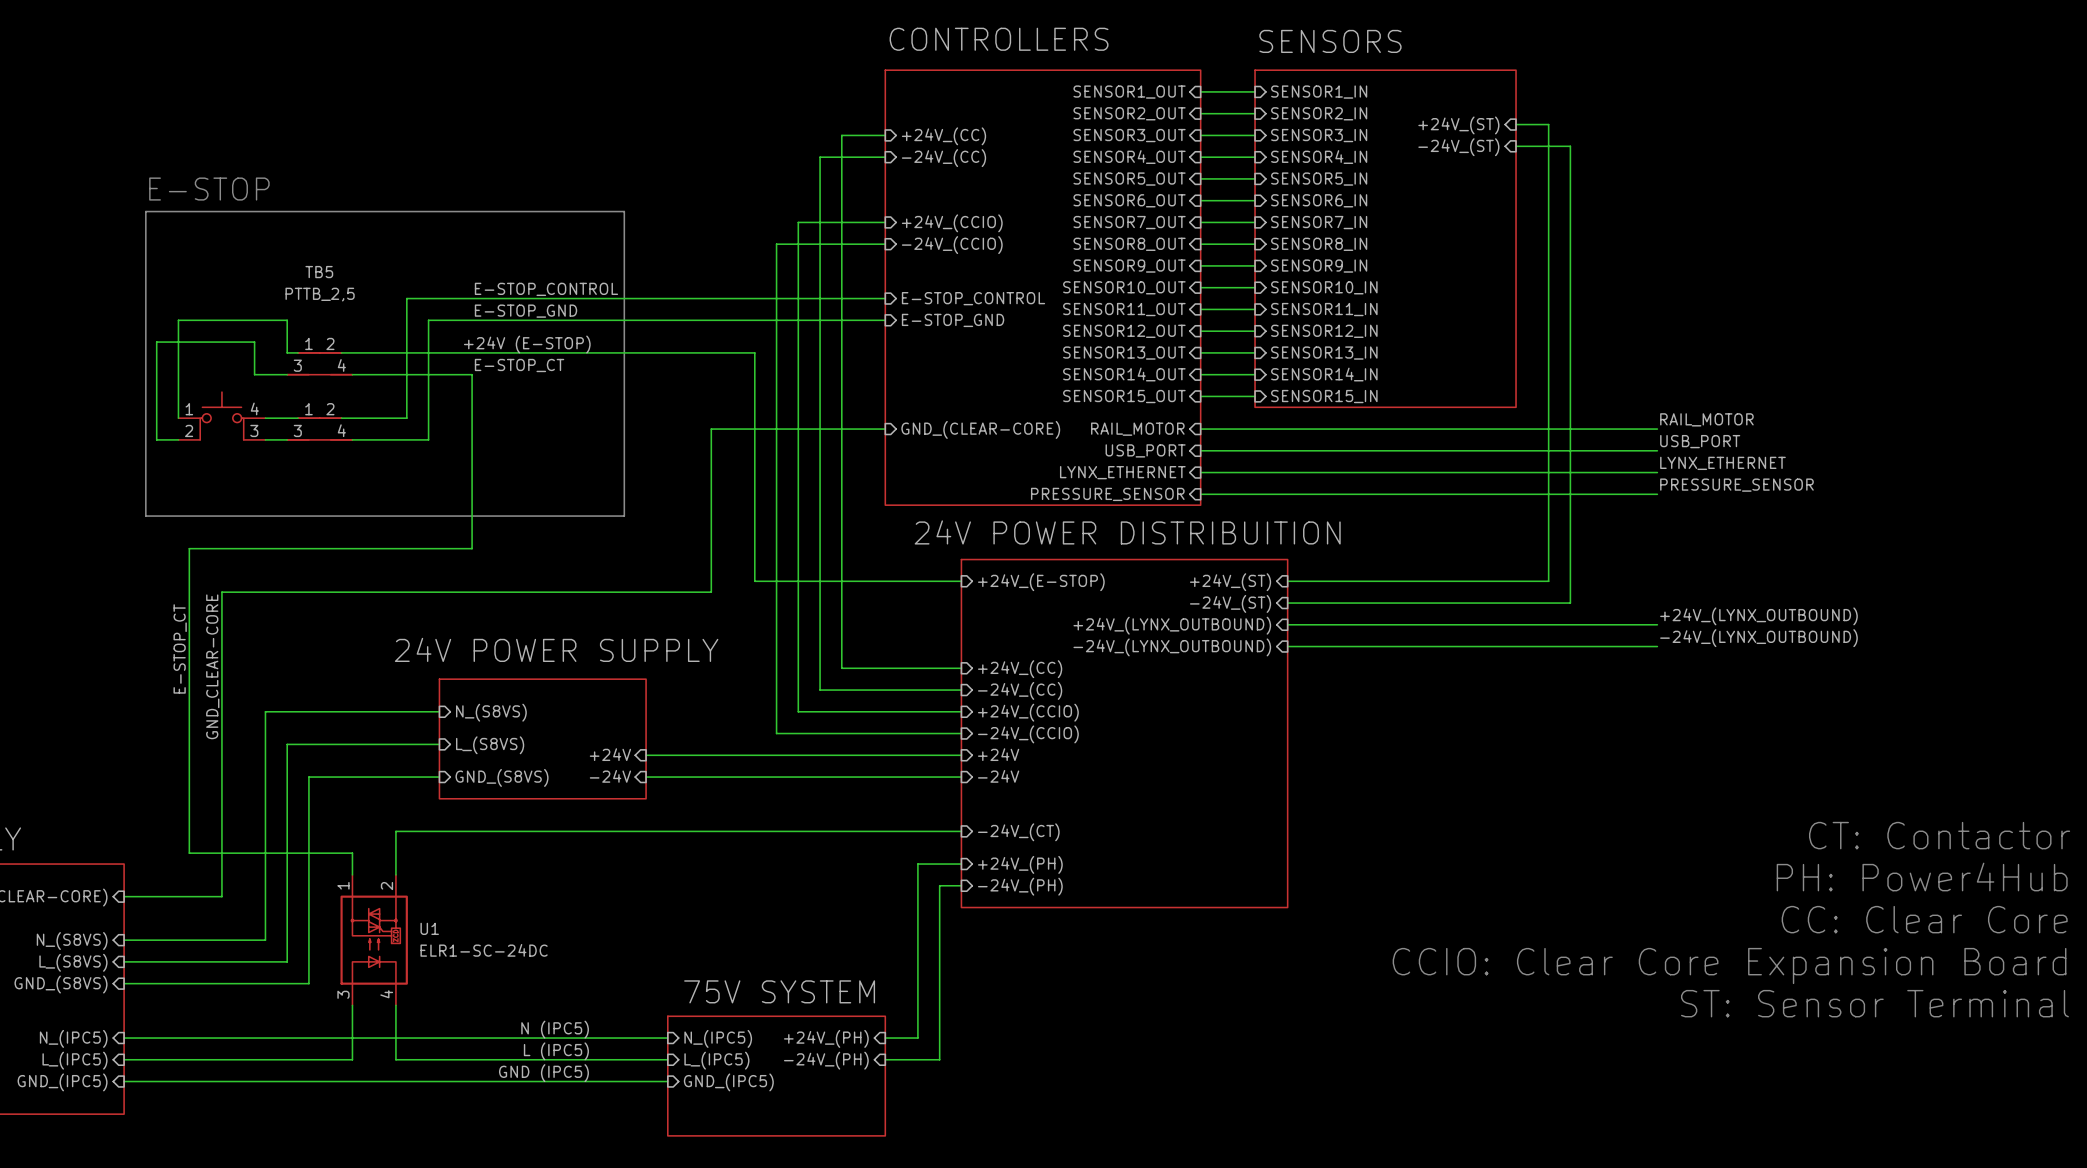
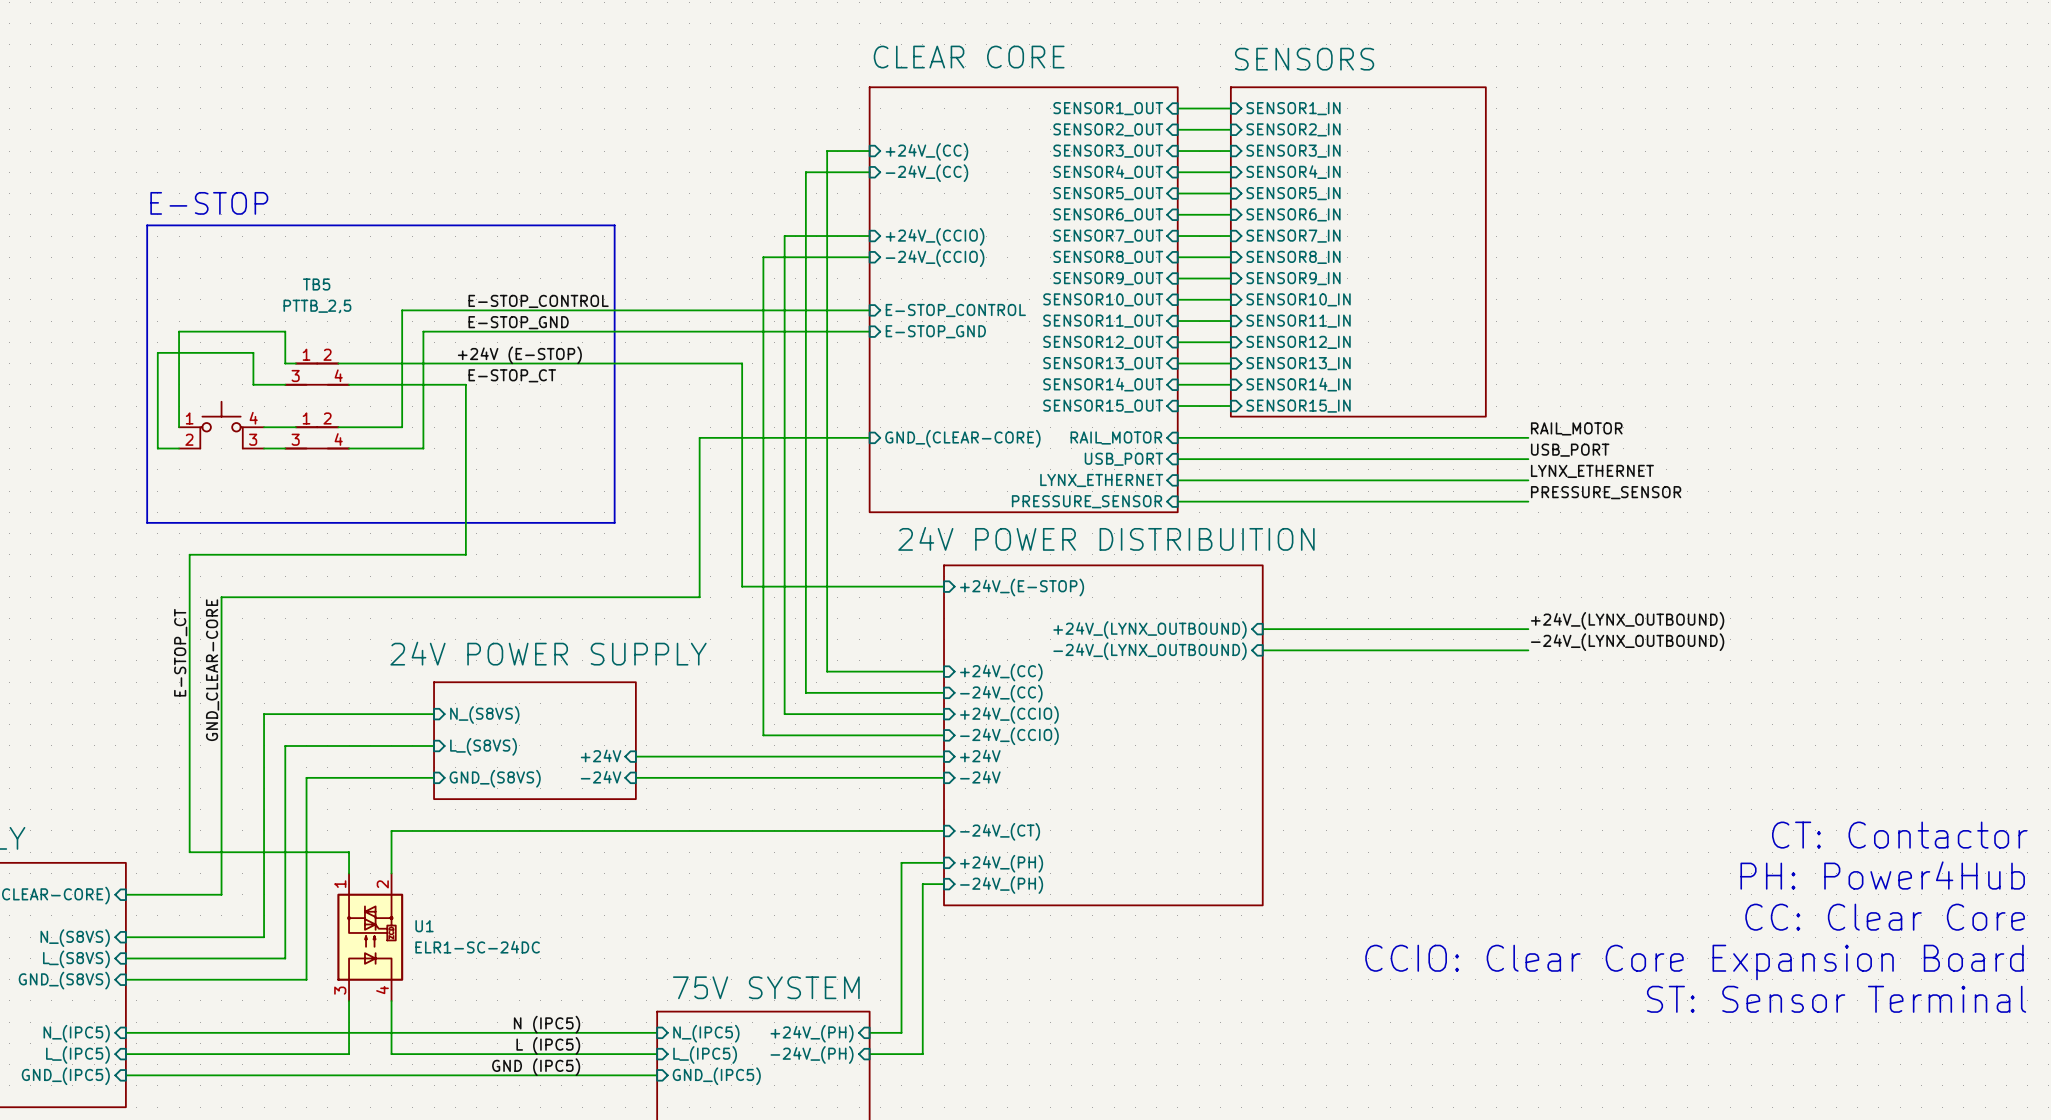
sheet CONTROLLERS name: CONTROLLERS (999, 39) -> CLEAR CORE (969, 57)
wire: (1516, 124) (1548, 124) (1548, 581) (1287, 581) -> none
sheet pin: +24V_(ST) (1458, 125) -> none
wire: (1516, 146) (1570, 146) (1570, 603) (1287, 603) -> none
sheet pin: -24V_(ST) (1458, 147) -> none
label position: RAIL_MOTOR (1706, 419) -> RAIL_MOTOR (1576, 428)
wire: (1559, 429) (1657, 429) -> none
label position: USB_PORT (1700, 441) -> USB_PORT (1570, 450)
wire: (1559, 450) (1657, 450) -> none
label position: LYNX_ETHERNET (1722, 463) -> LYNX_ETHERNET (1592, 471)
wire: (1559, 472) (1657, 472) -> none
label position: PRESSURE_SENSOR (1736, 485) -> PRESSURE_SENSOR (1606, 492)
wire: (1559, 494) (1657, 494) -> none
sheet pin: +24V_(ST) (1230, 582) -> none
sheet pin: -24V_(ST) (1230, 603) -> none
label position: +24V_(LYNX_OUTBOUND) (1758, 616) -> +24V_(LYNX_OUTBOUND) (1627, 620)
wire: (1559, 624) (1657, 624) -> none
label position: -24V_(LYNX_OUTBOUND) (1758, 638) -> -24V_(LYNX_OUTBOUND) (1627, 642)
wire: (1559, 646) (1657, 646) -> none

